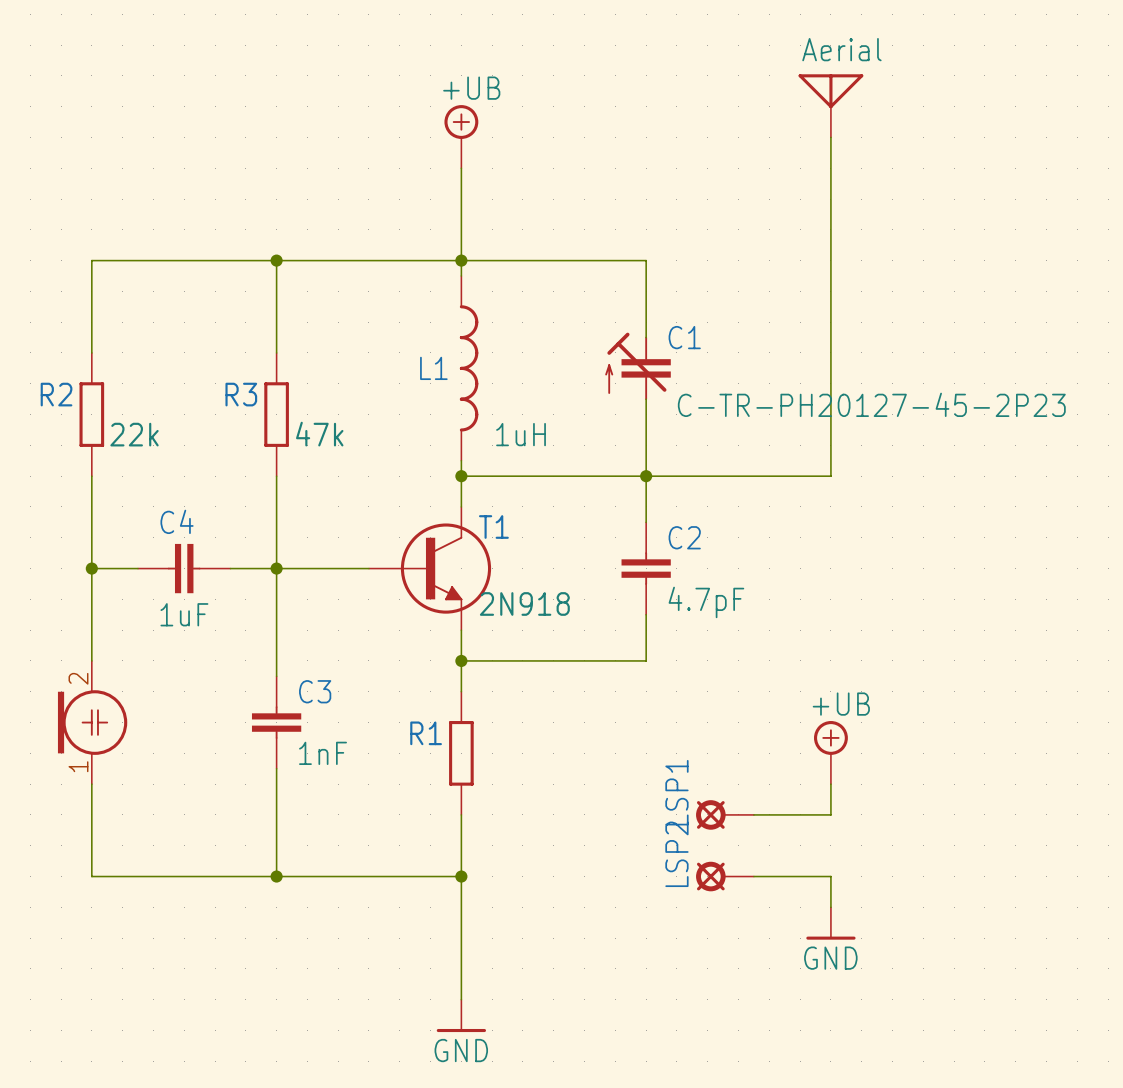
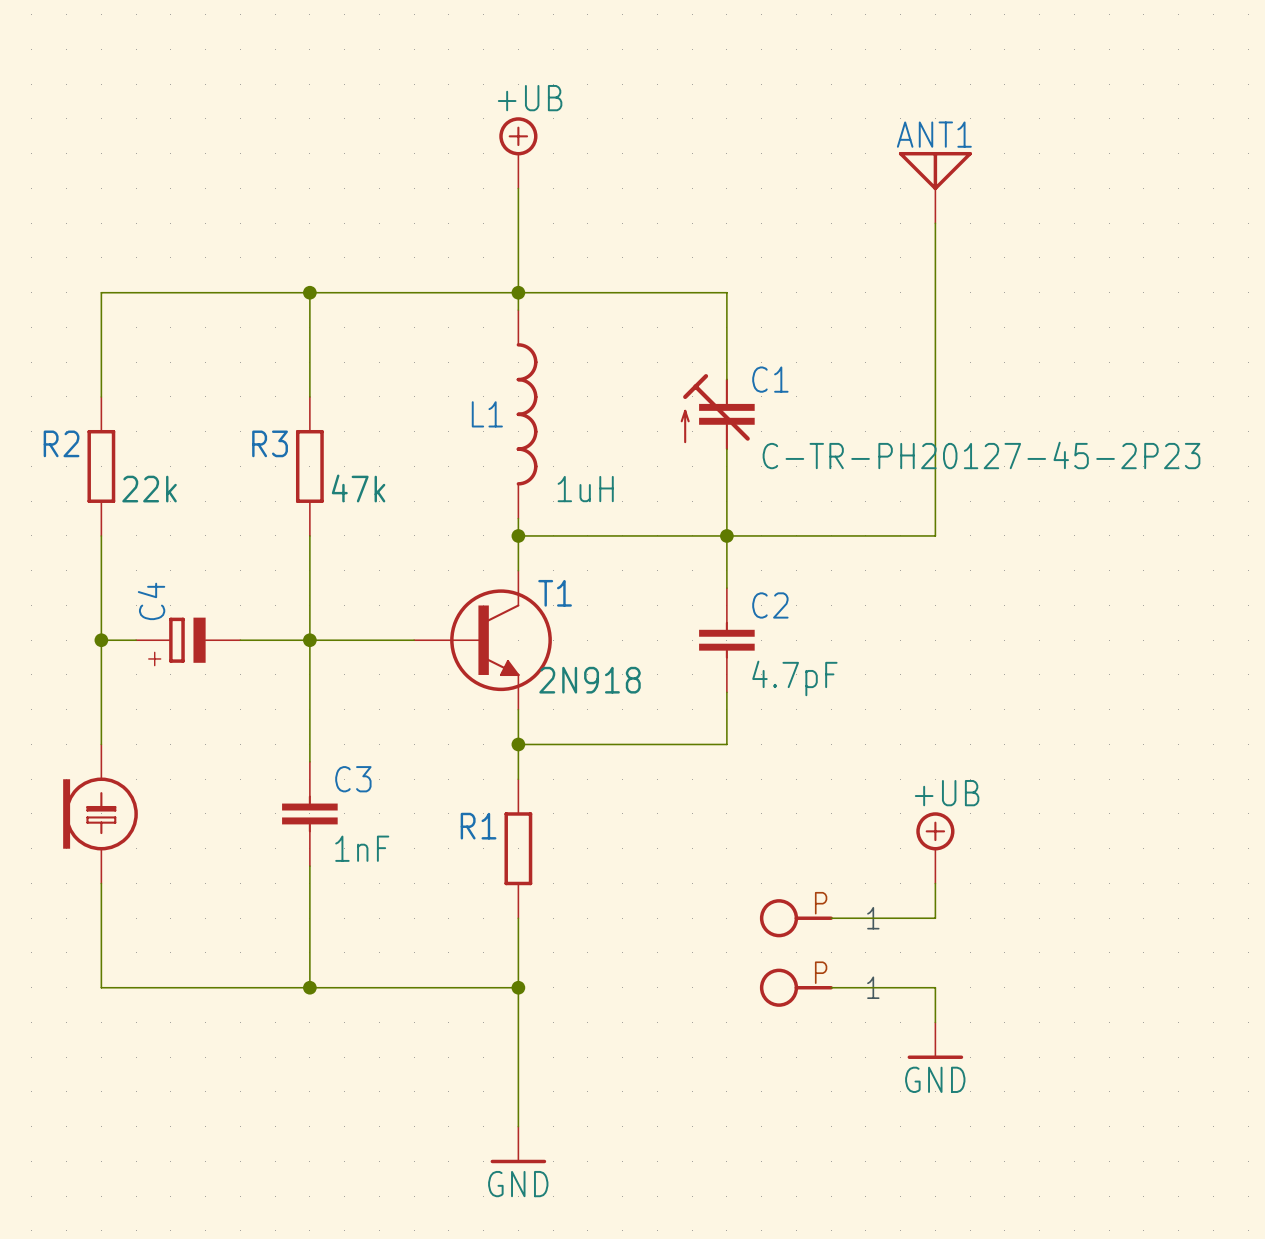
part: Aerial (830, 105) -> none
ANT1: none -> (935, 187)
C4 name position: C4 (177, 521) -> C4 (151, 601)
C4 symbol: [138, 543, 231, 594] -> [136, 617, 241, 663]
C4 value: 1uF (184, 614) -> none
part symbol: [57, 660, 128, 785] -> [63, 744, 138, 884]
part: none -> (796, 918)
LSP1: (725, 814) -> none
part: none -> (796, 987)
LSP2: (725, 876) -> none

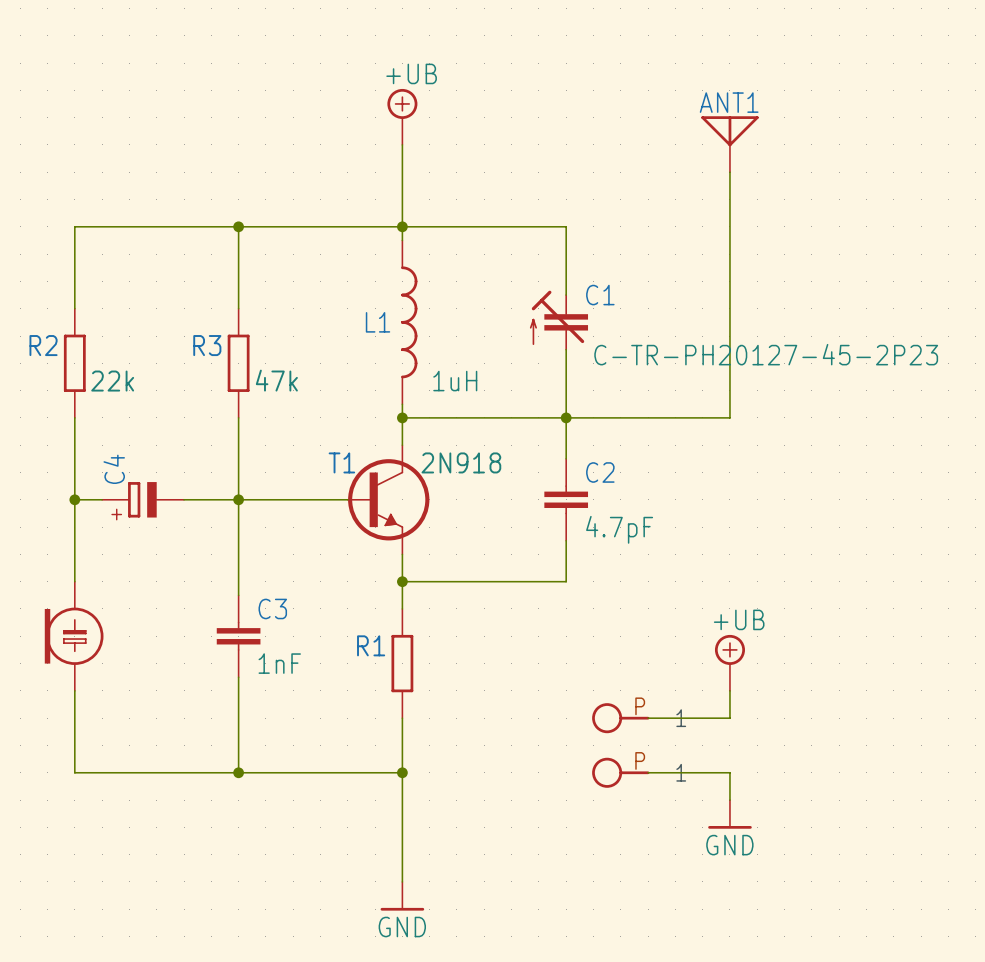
T1 symbol: [414, 570, 552, 710] -> [347, 445, 430, 555]
T1 name position: T1 (555, 593) -> T1 (341, 462)
T1 value position: 2N918 (590, 680) -> 2N918 (461, 462)

